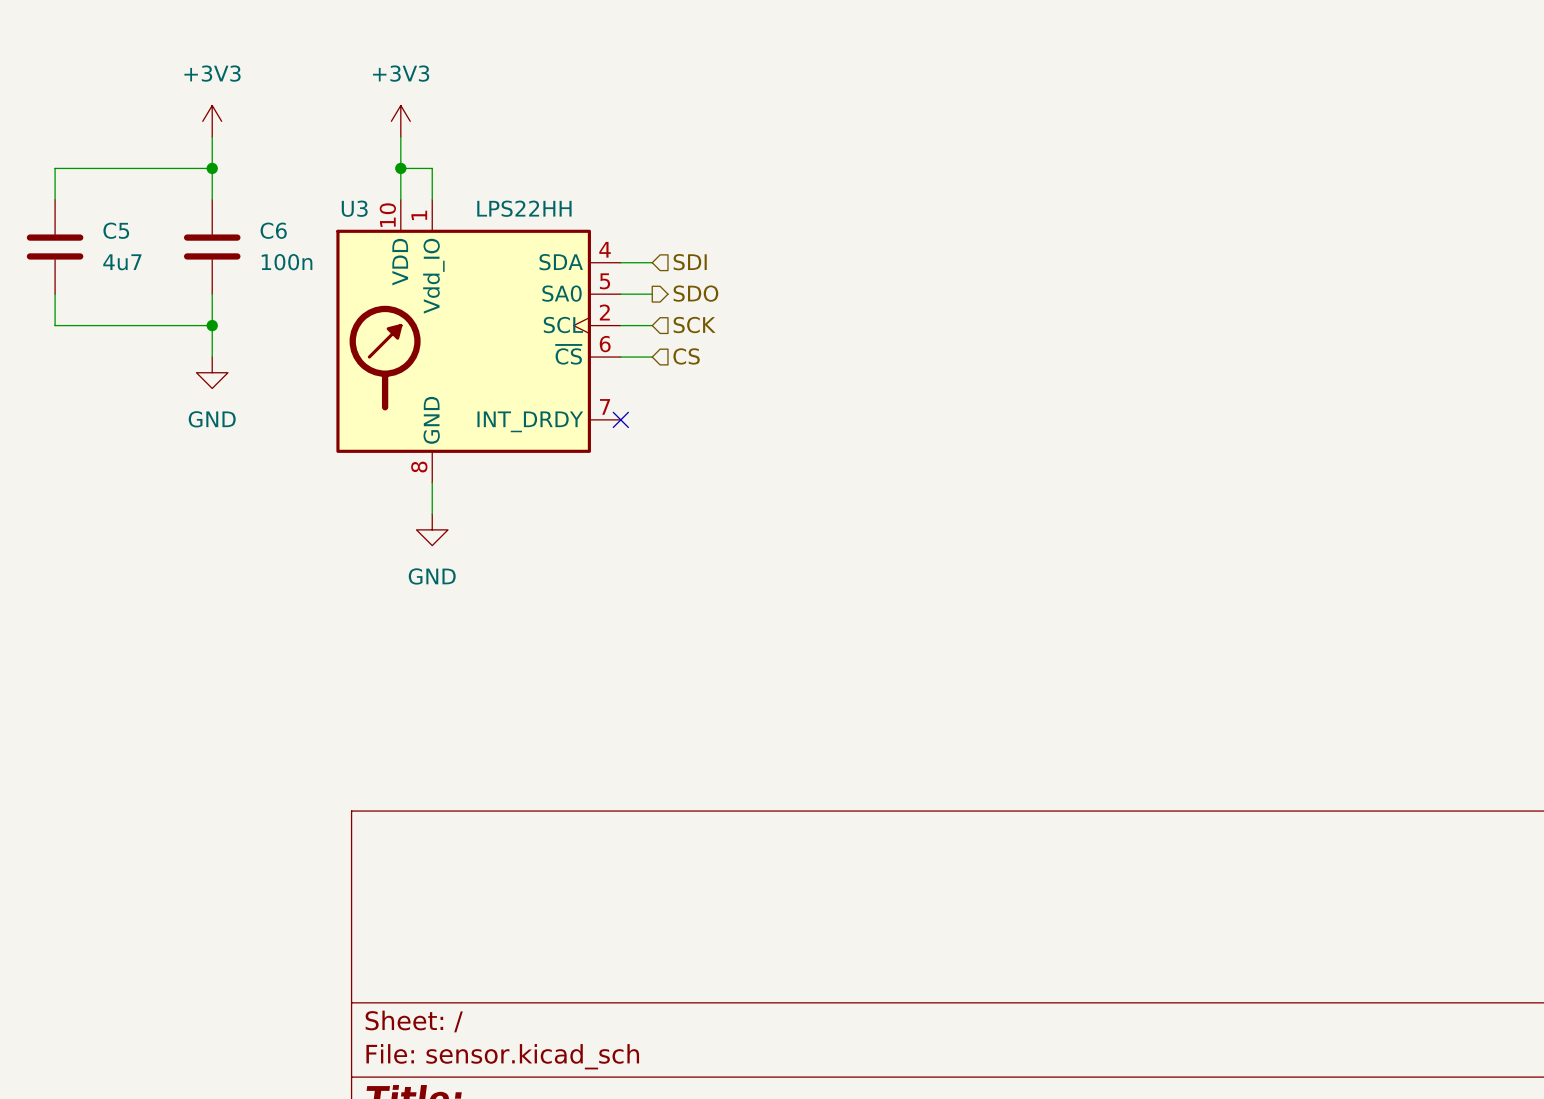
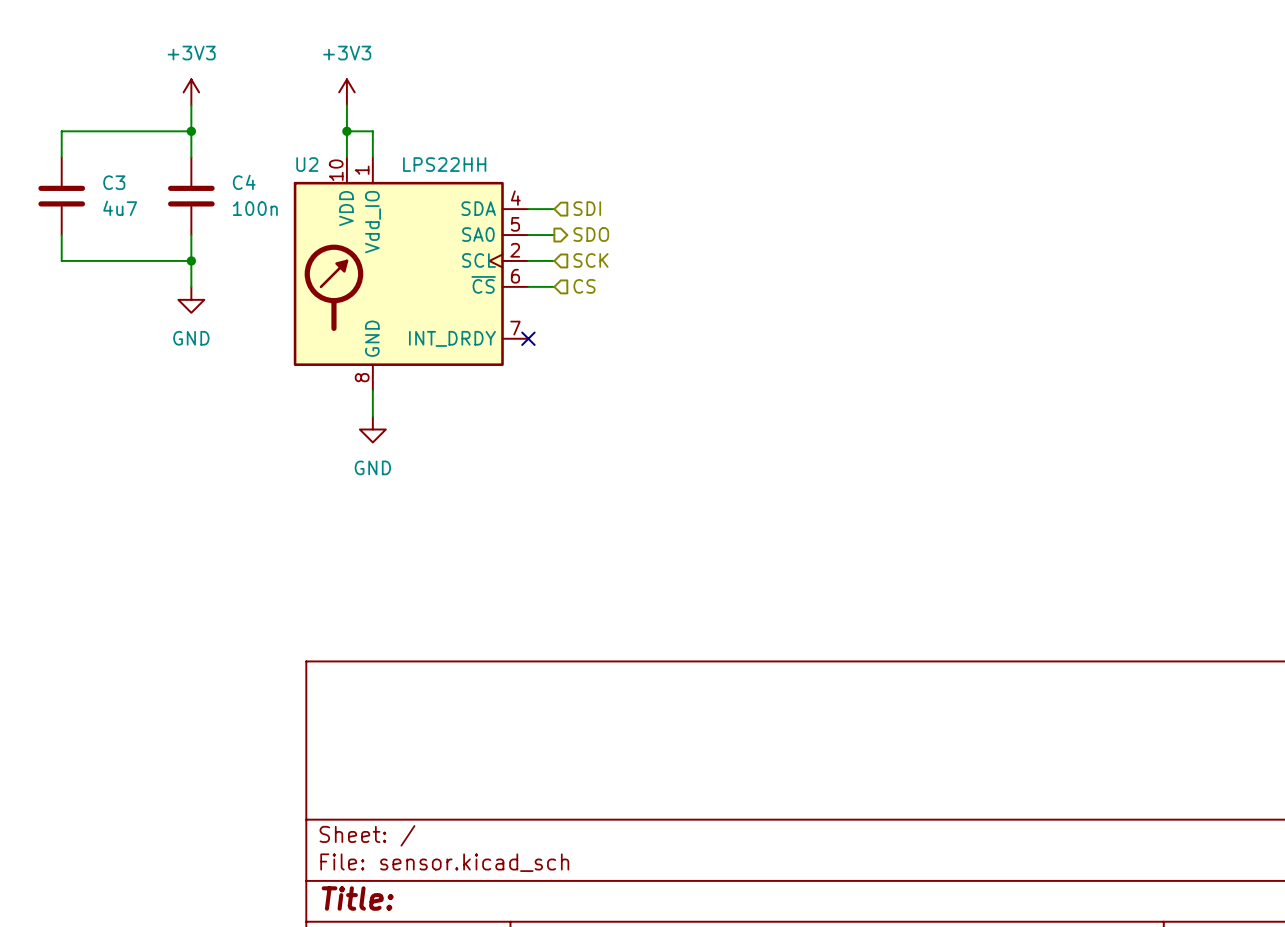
U3 name: U3 (354, 208) -> U2 (307, 164)
C5 name: C5 (116, 230) -> C3 (114, 182)
C6 name: C6 (273, 230) -> C4 (244, 182)

